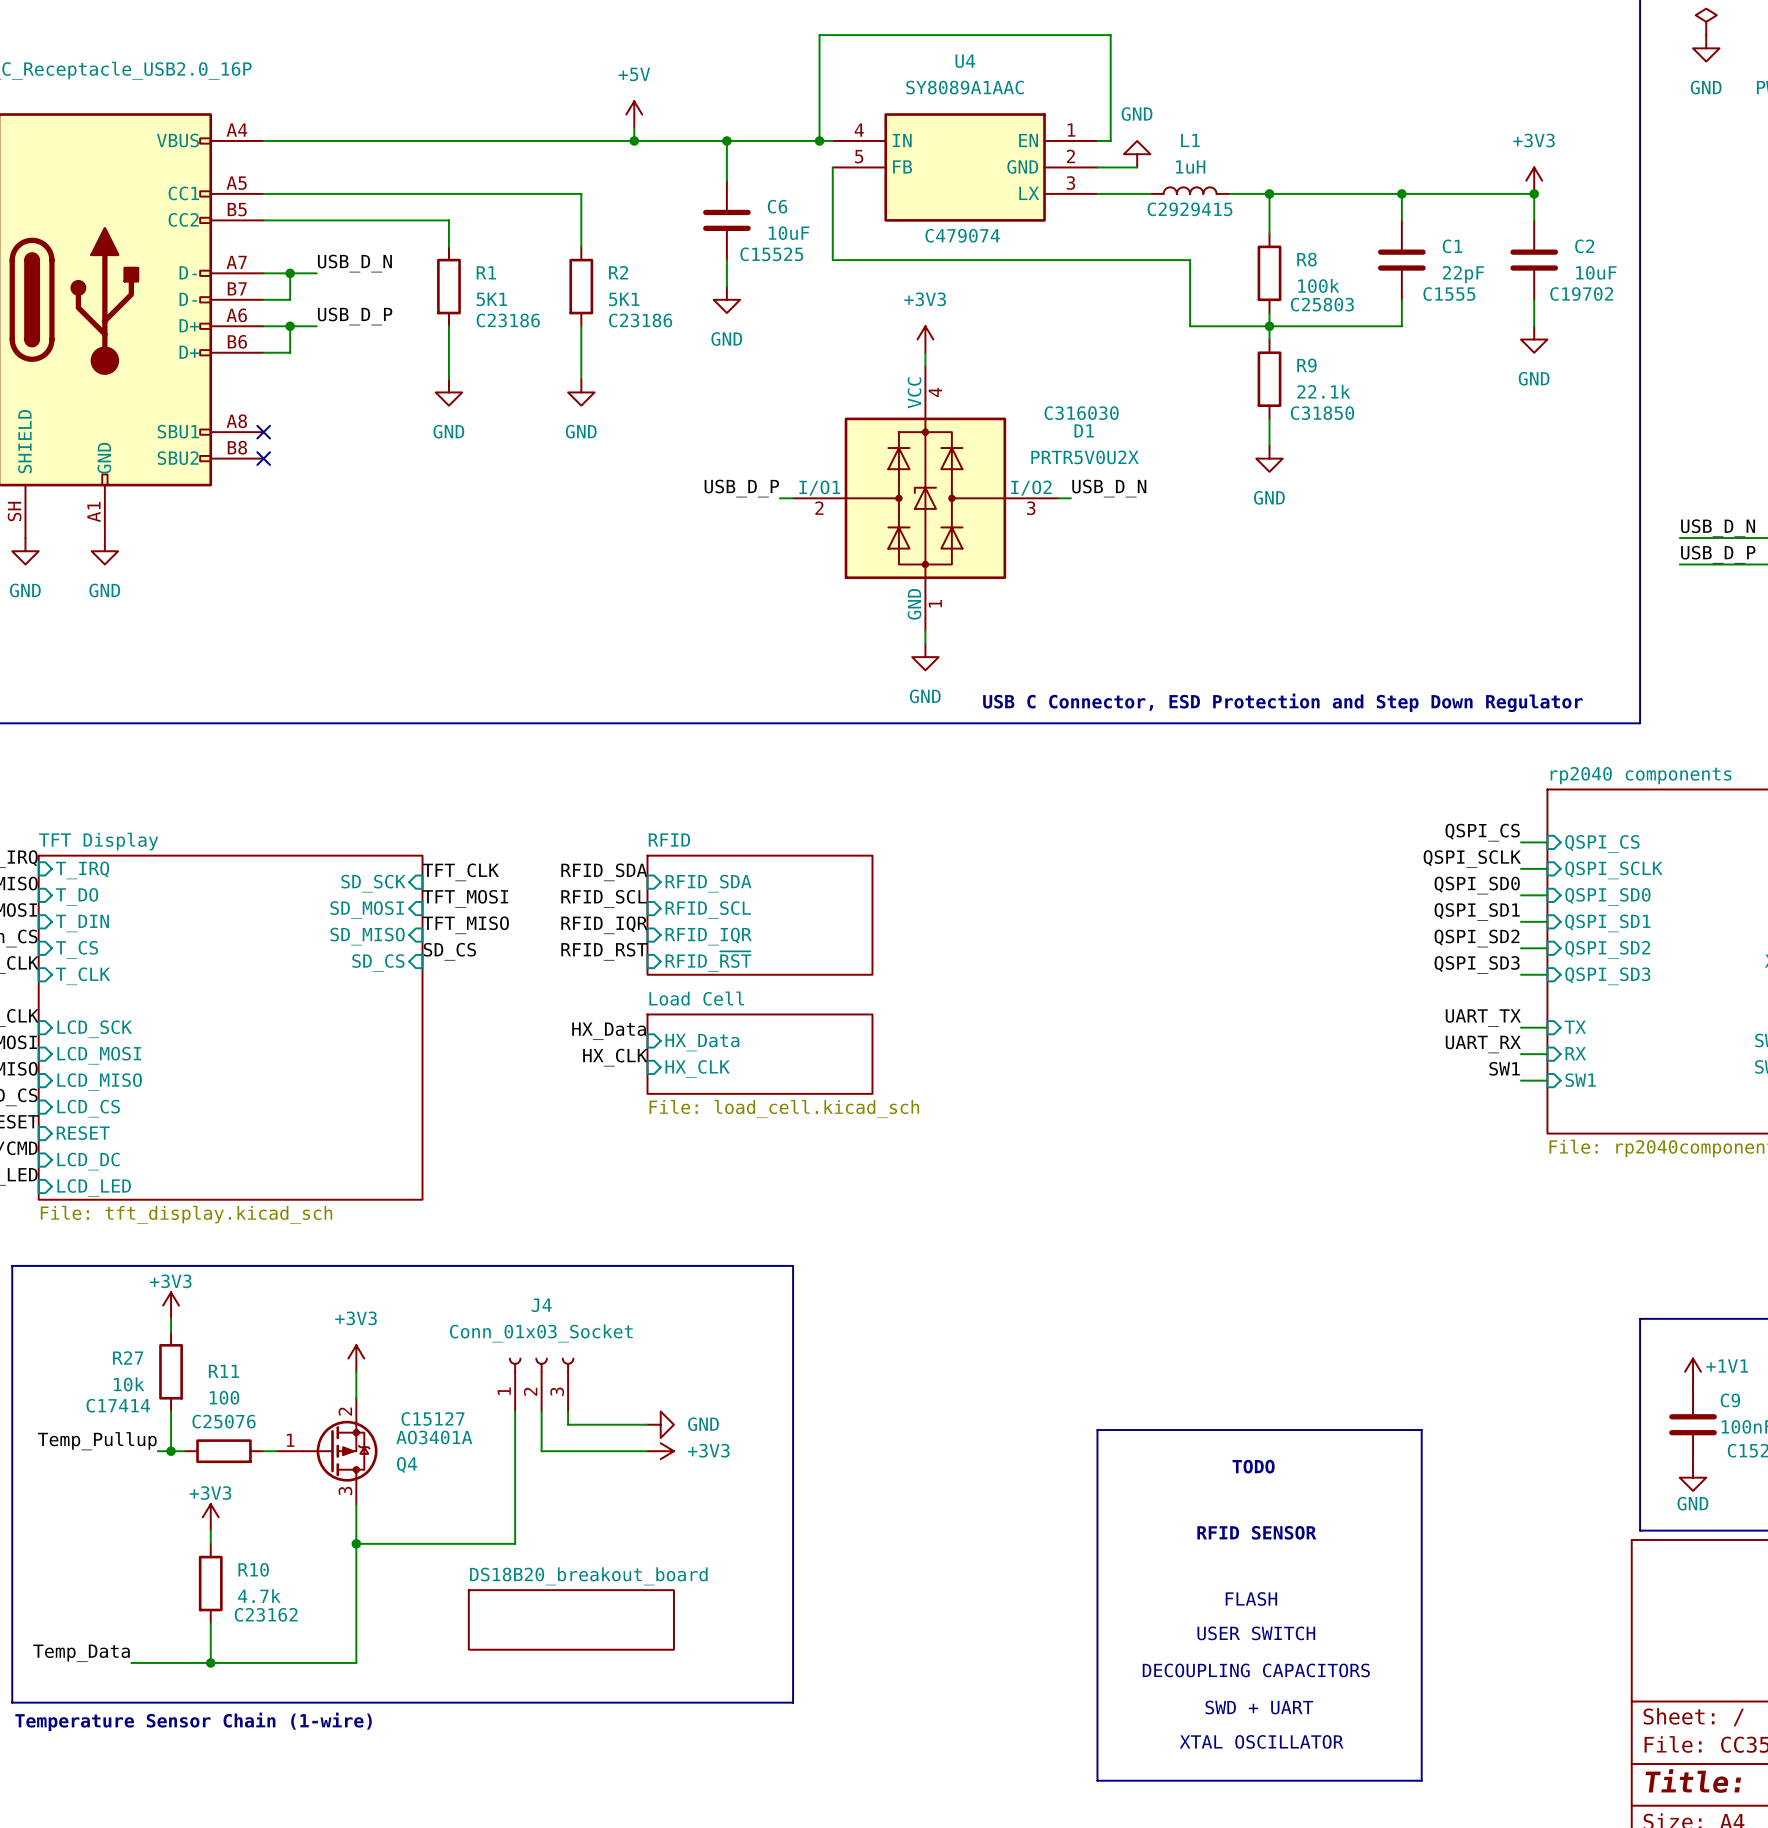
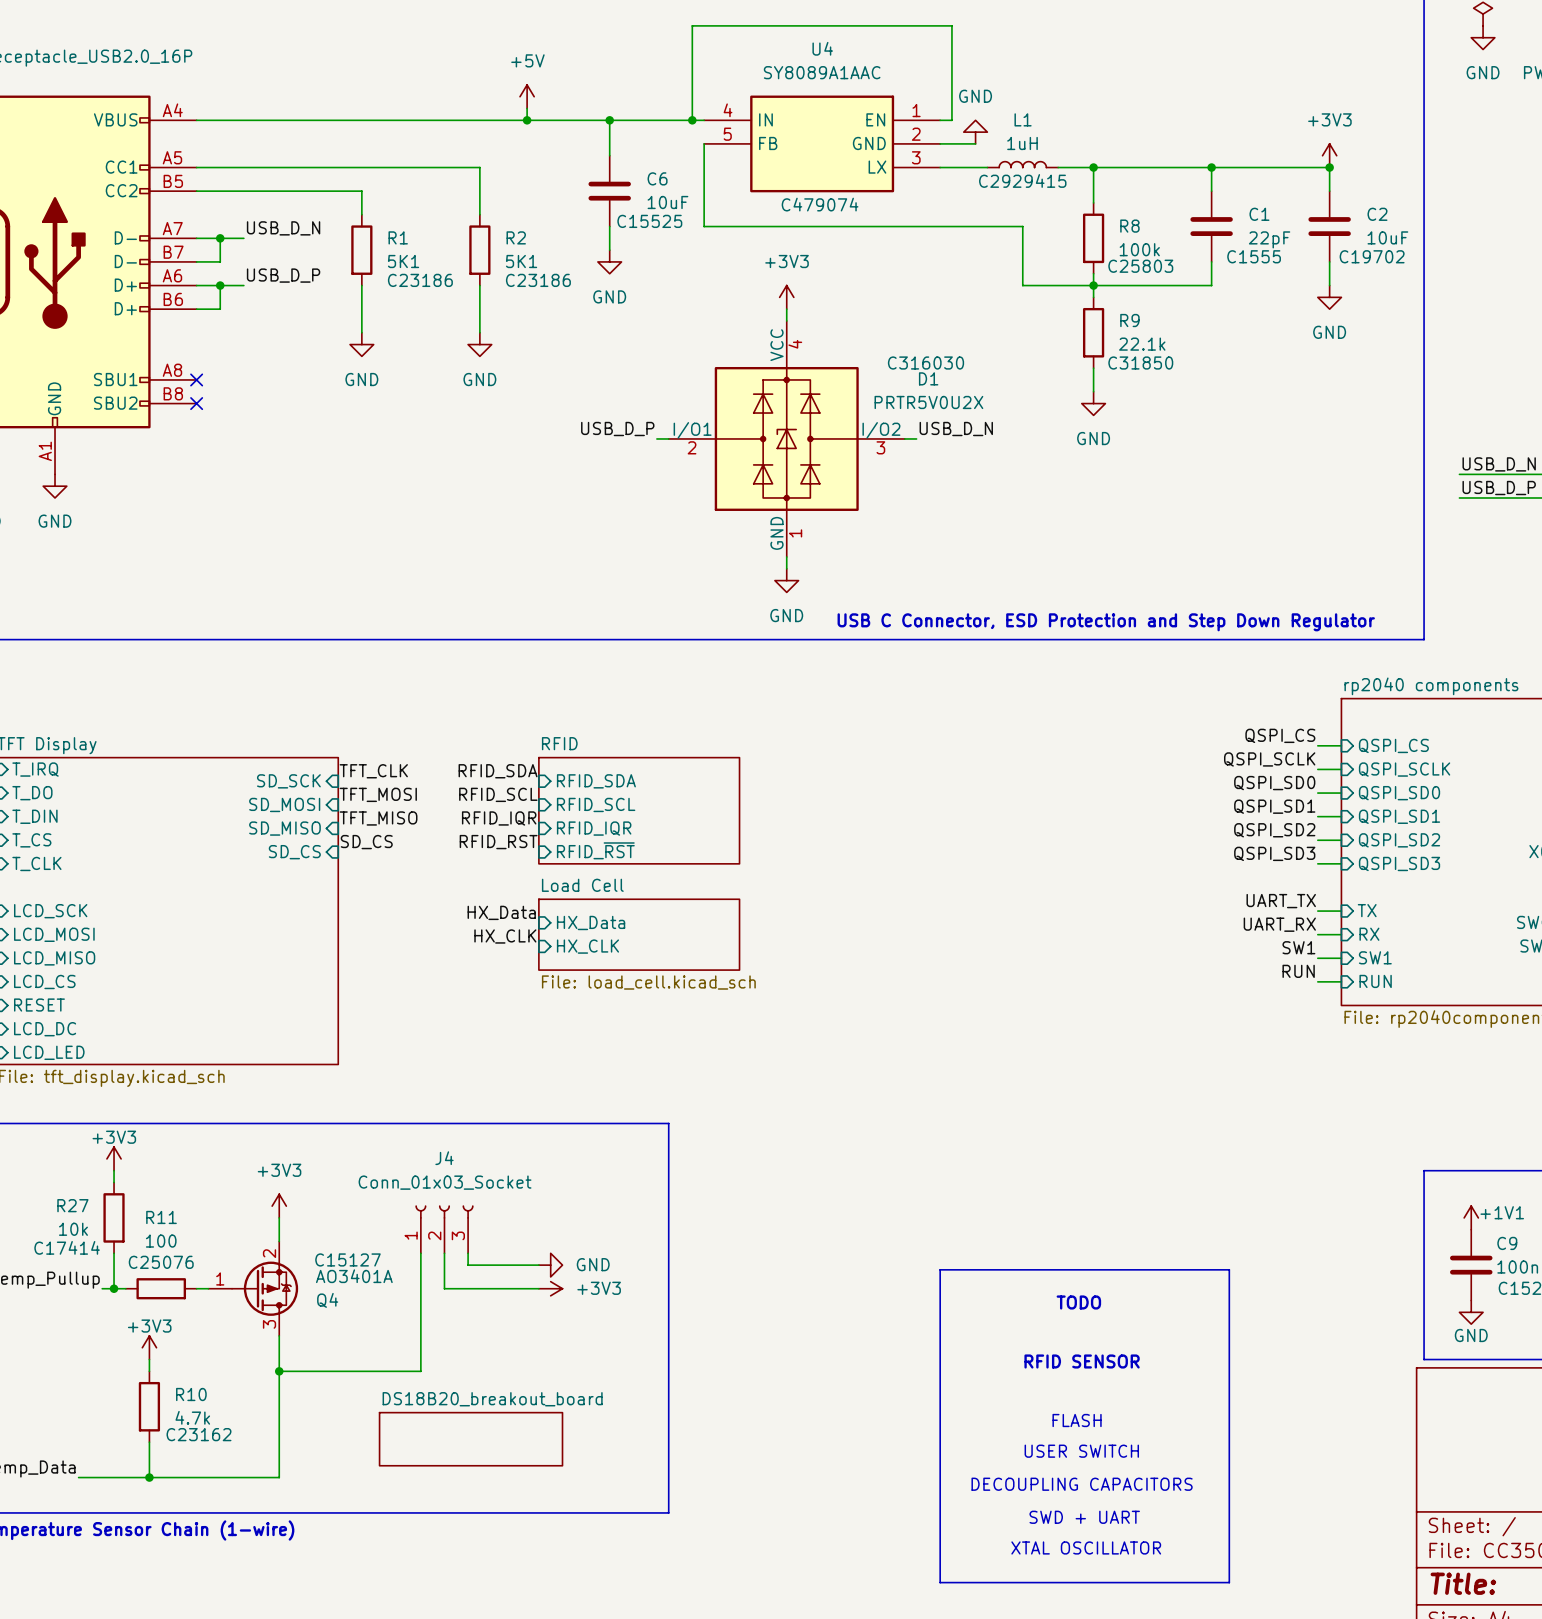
label: none -> RUN (1298, 971)
sheet pin: none -> RUN (1375, 981)
wire: none -> (1317, 981) (1341, 981)

